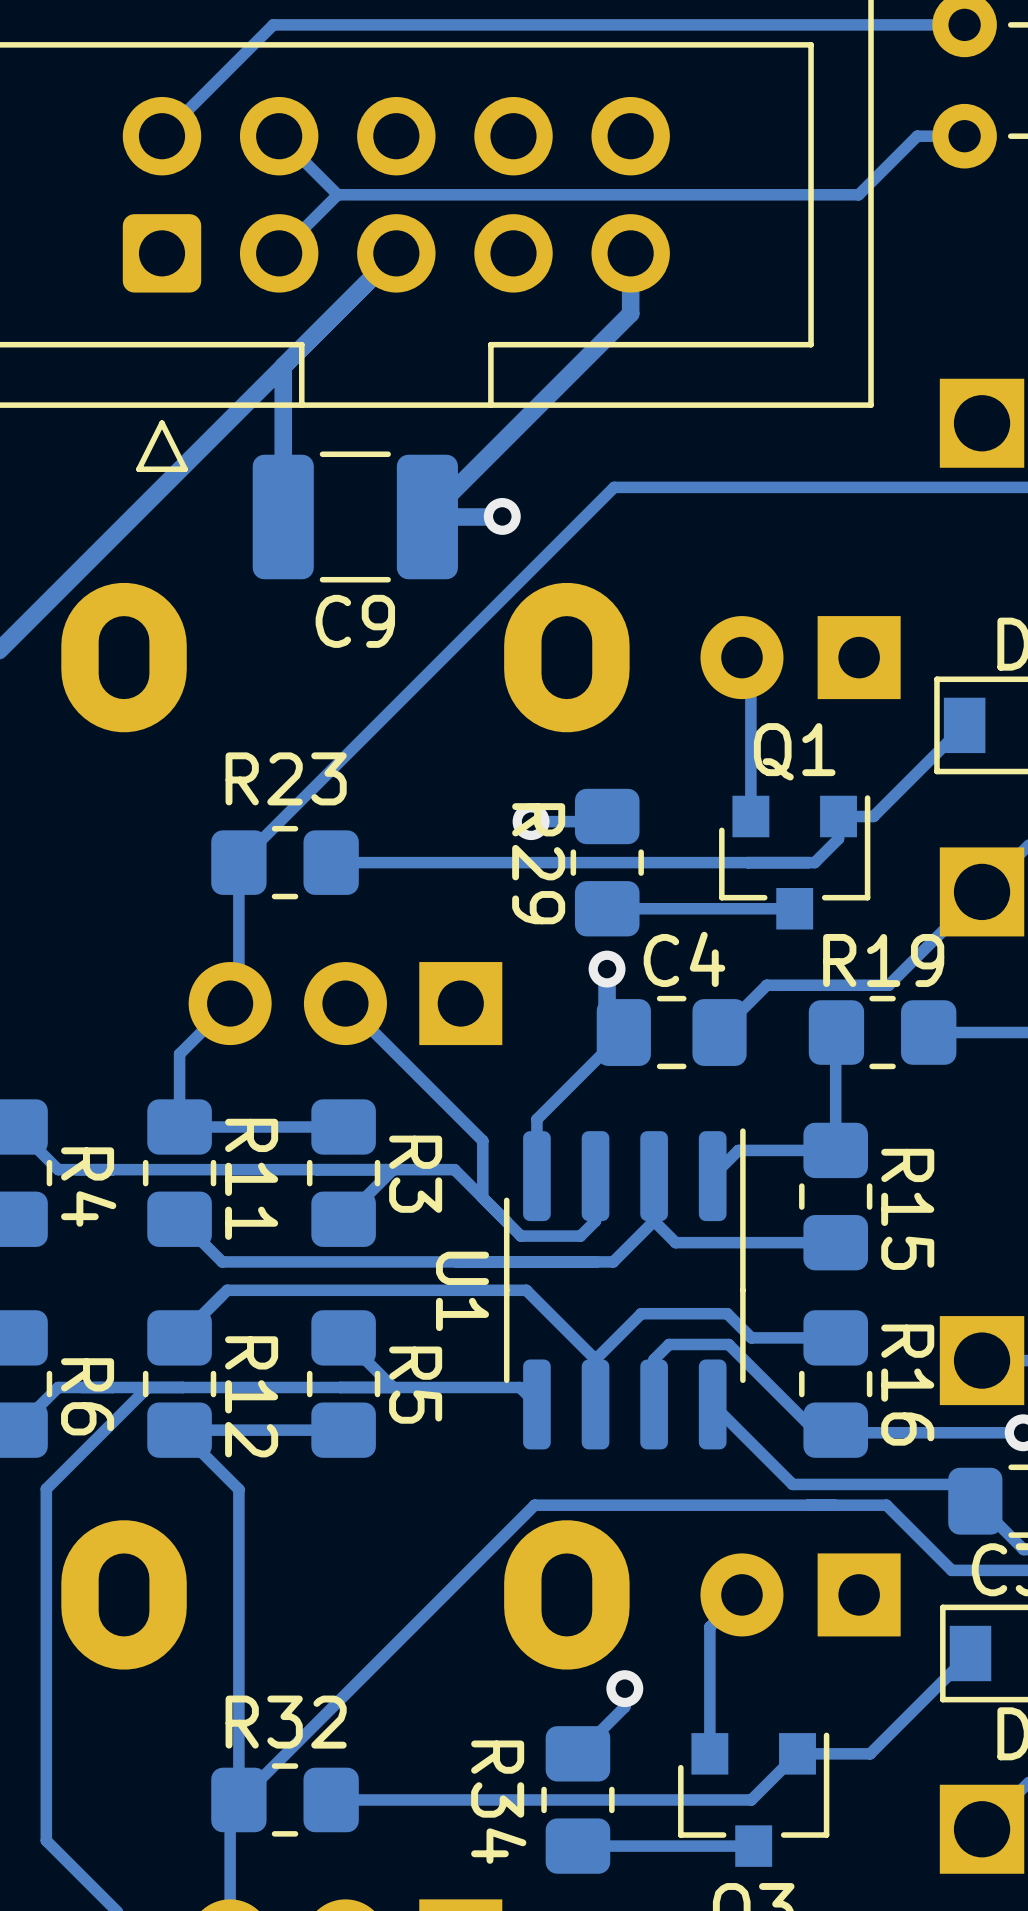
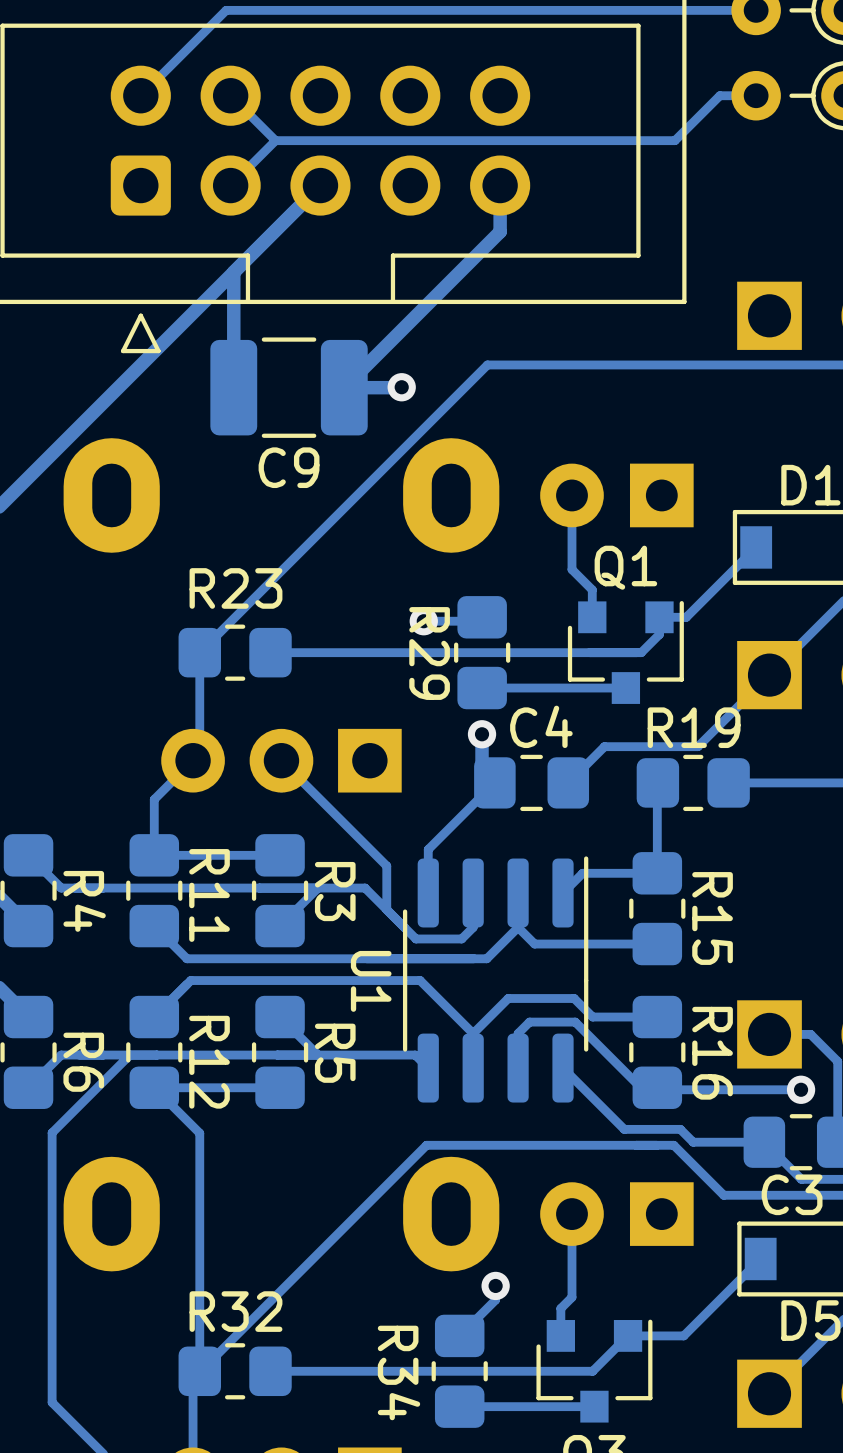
track: (741, 657) (750, 666) (750, 780) -> (571, 495) (571, 569) (592, 589)
part position: (800, 657) -> (616, 495)
track: (865, 1484) (958, 1484) (975, 1501) -> (680, 1129) (693, 1142) (764, 1142)
track: (857, 1505) (886, 1505) (951, 1570) -> (673, 1145) (723, 1195) (746, 1195)
track: (741, 1594) (709, 1627) (709, 1718) -> (571, 1214) (571, 1297) (560, 1308)
part position: (800, 1594) -> (616, 1214)

